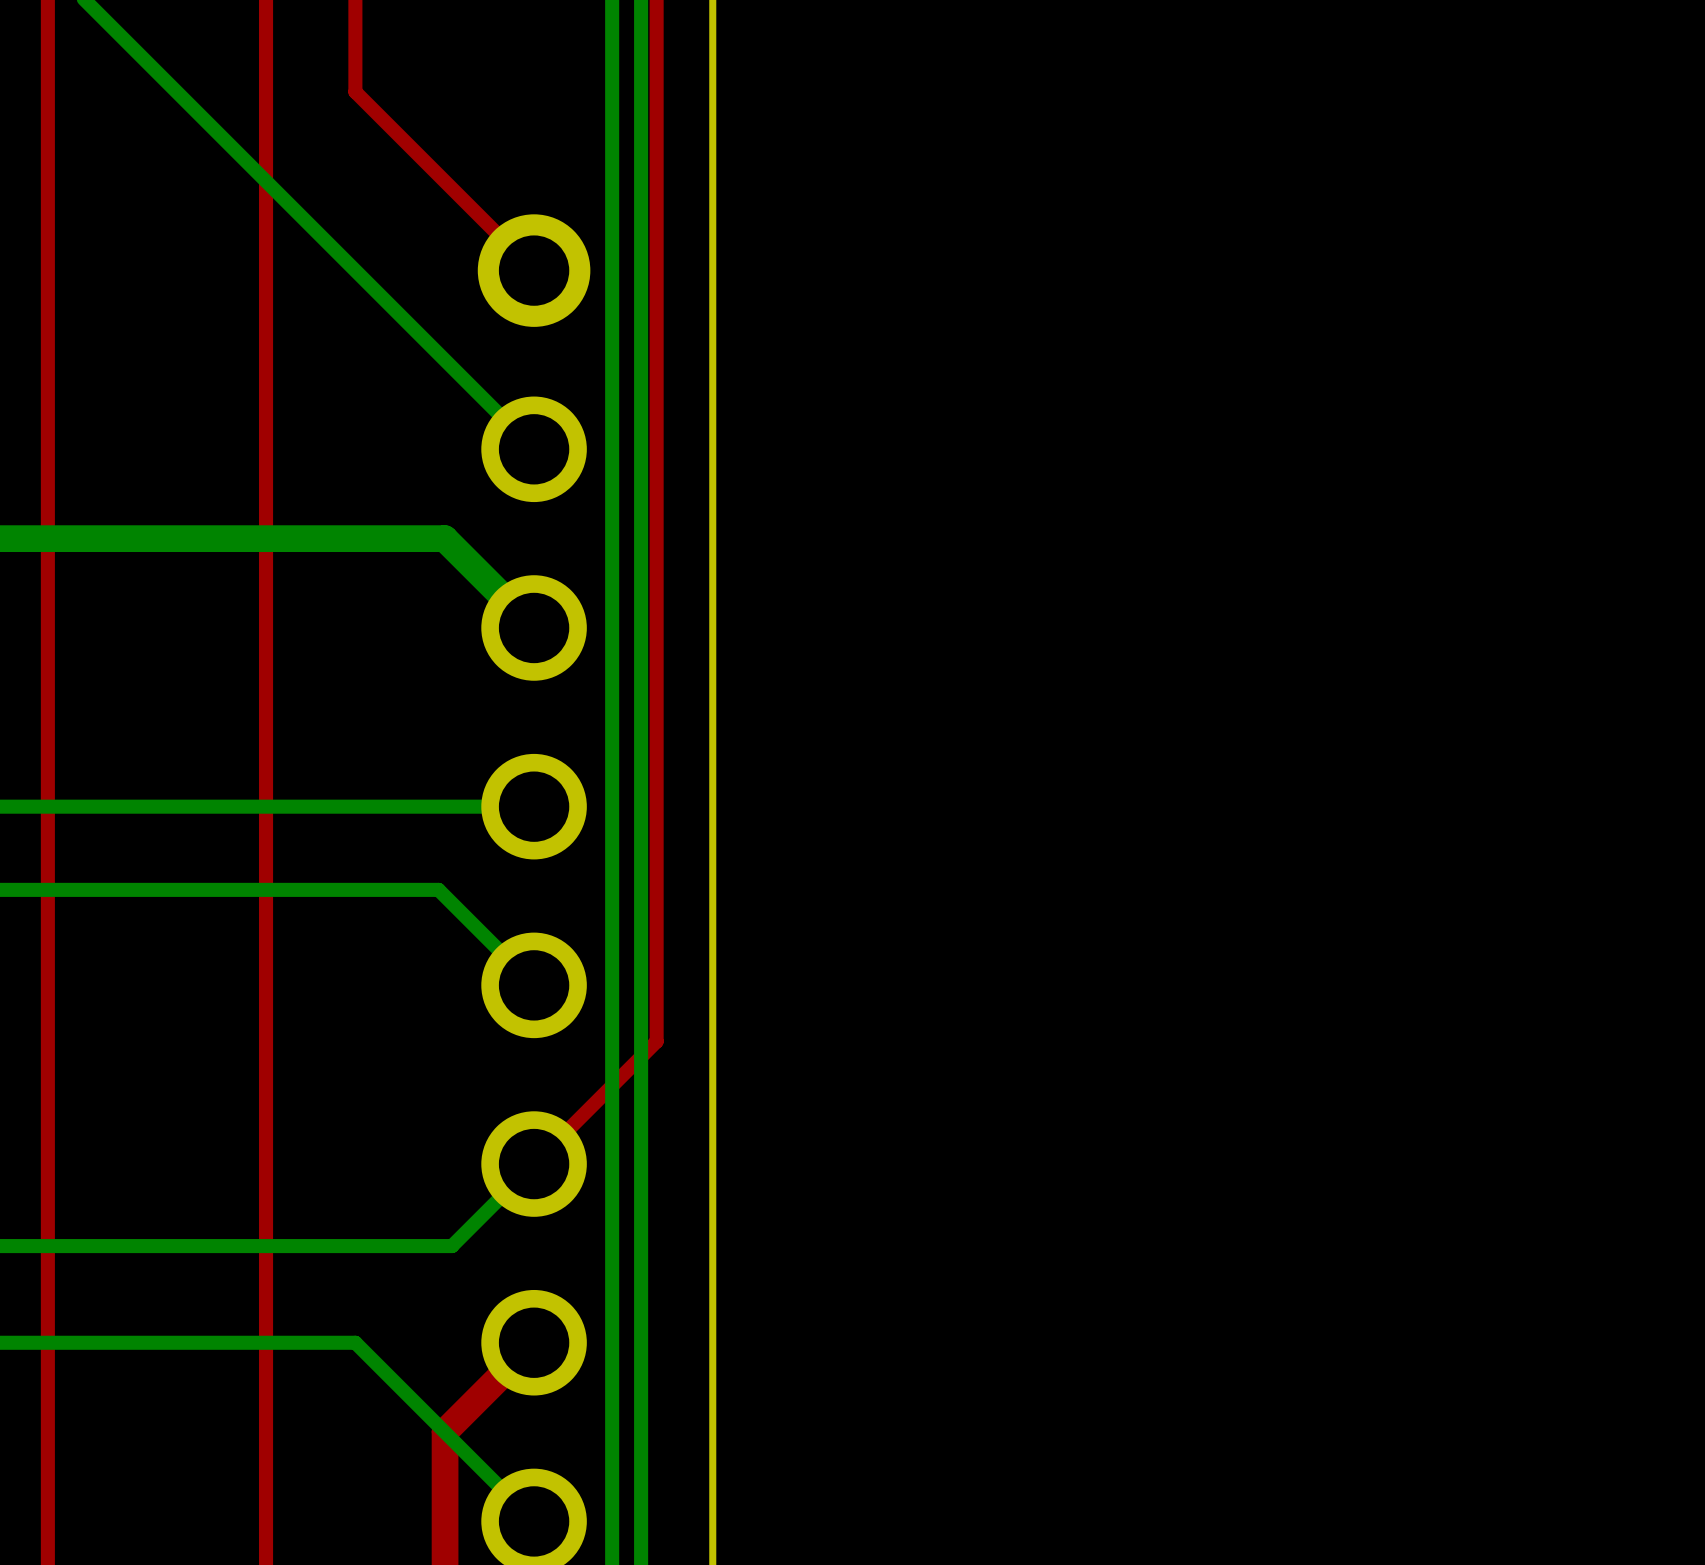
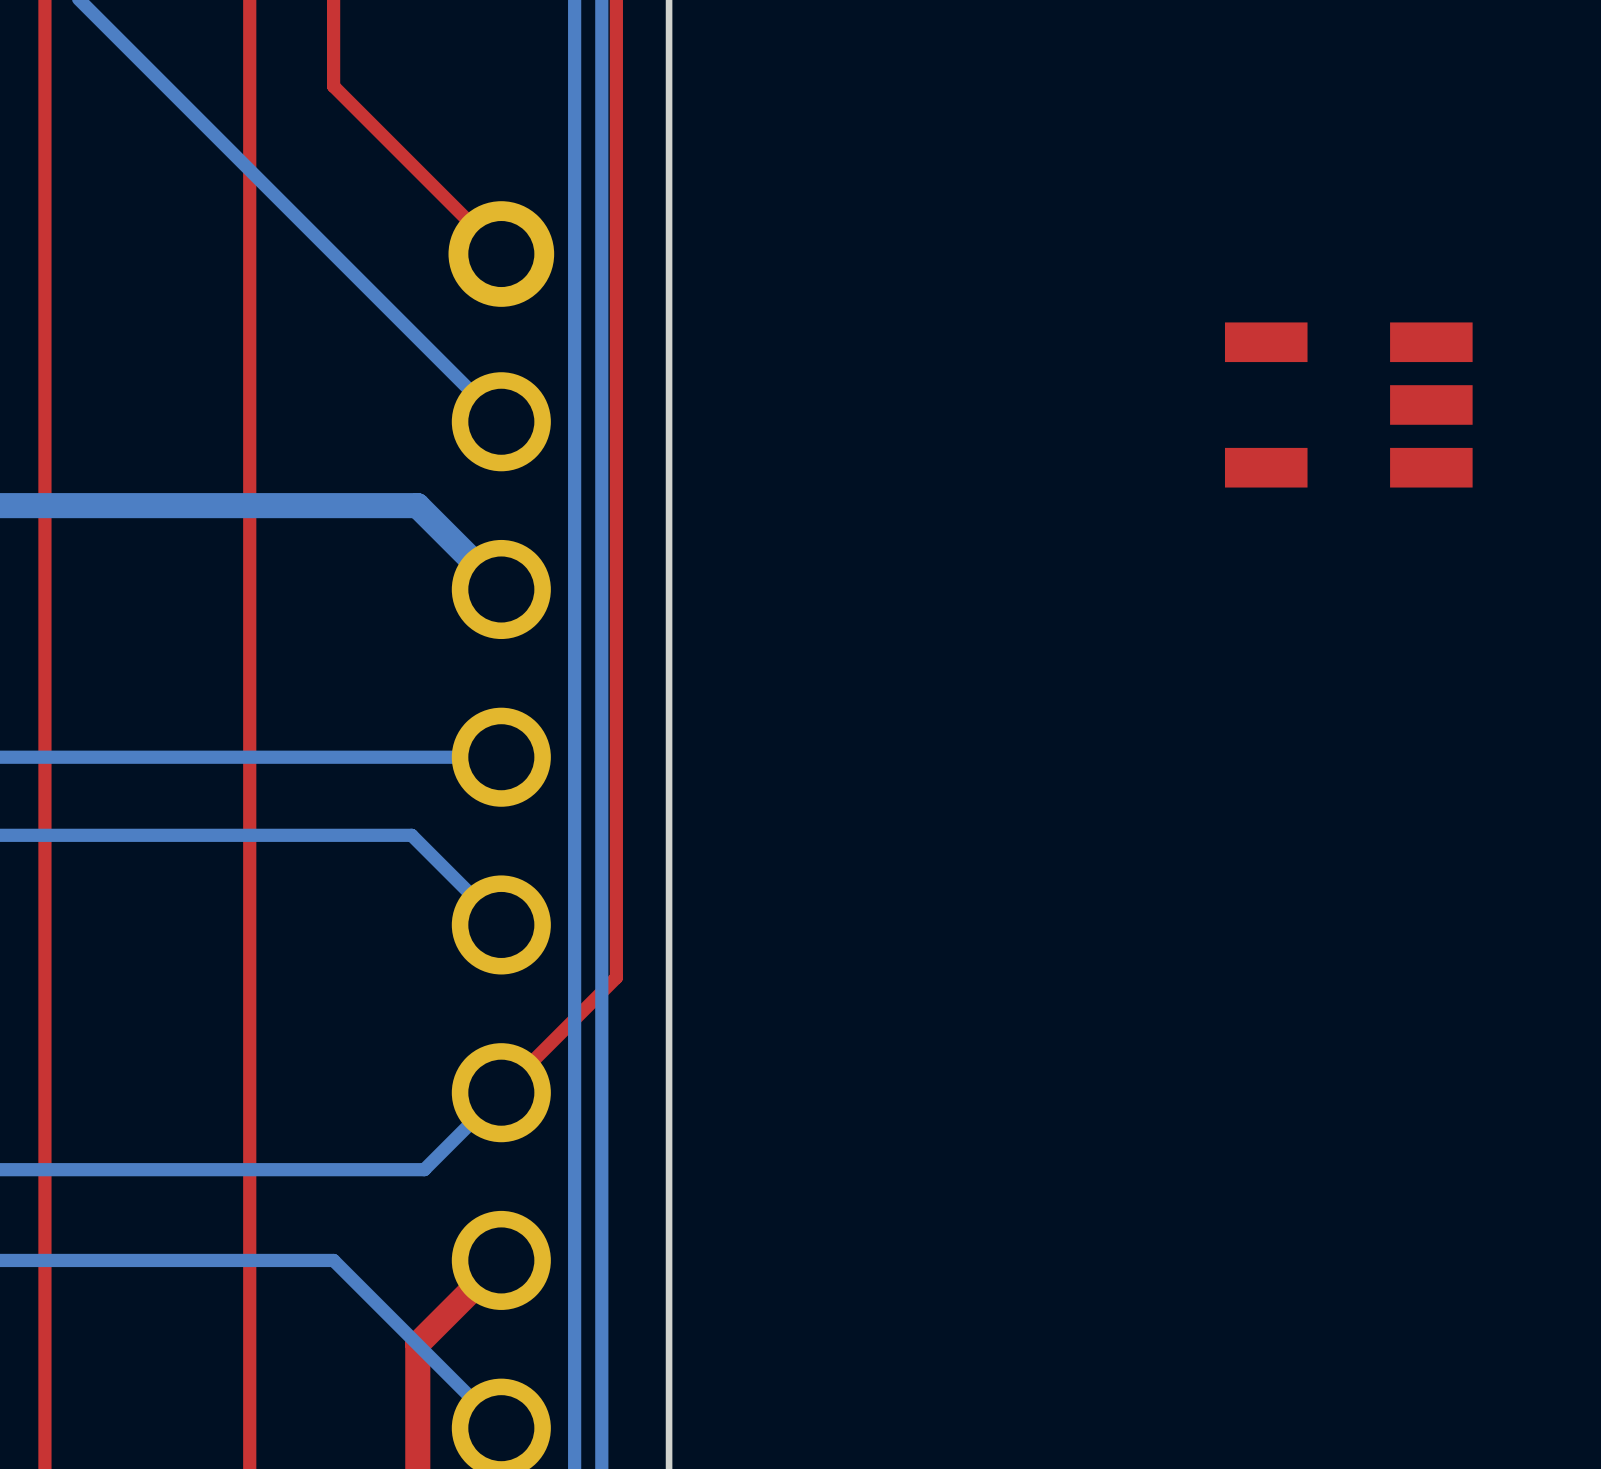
part: none -> (1348, 404)

